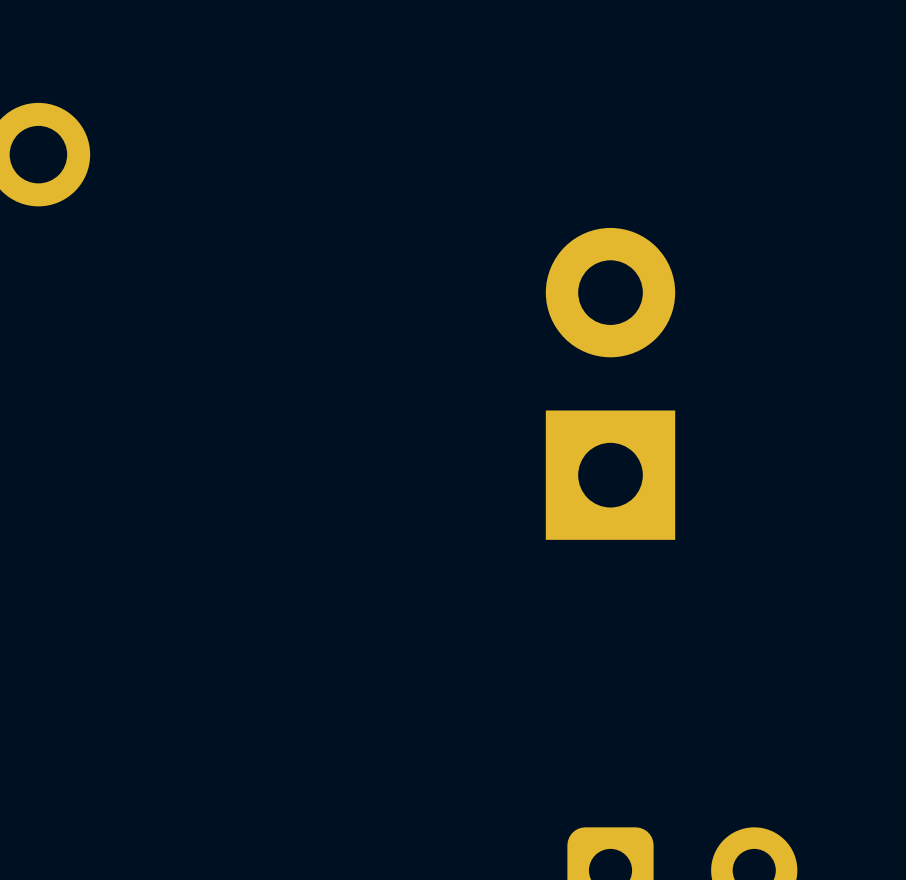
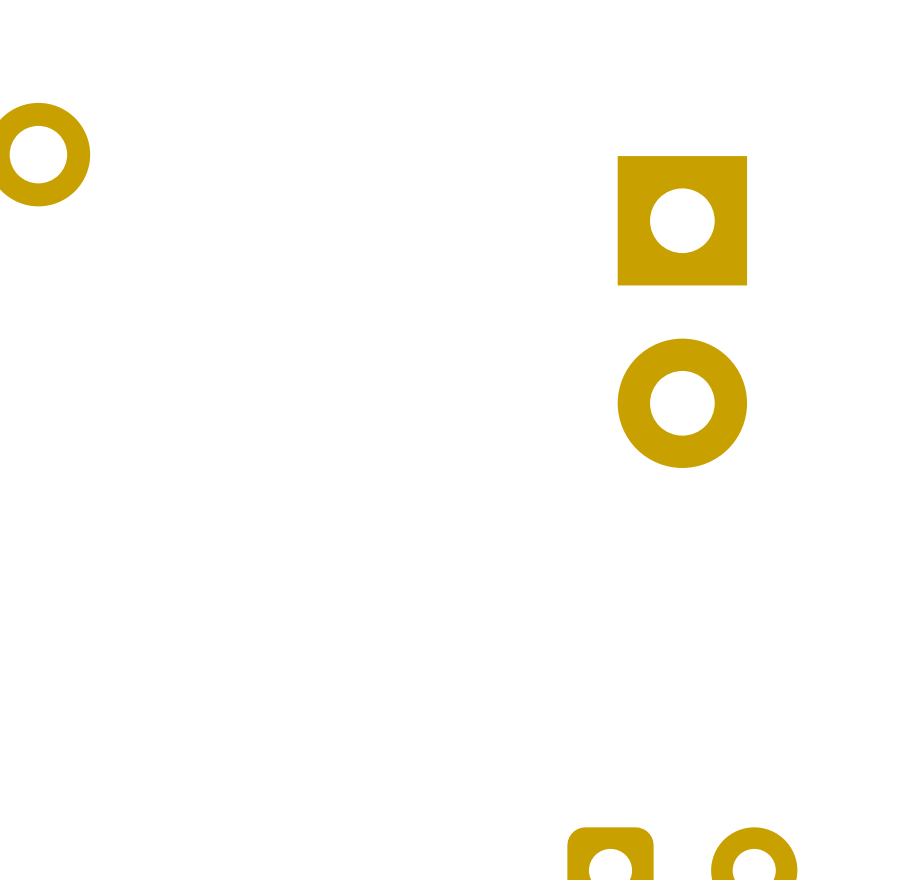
part rotation: 0° (610, 383) -> 180° (682, 312)

